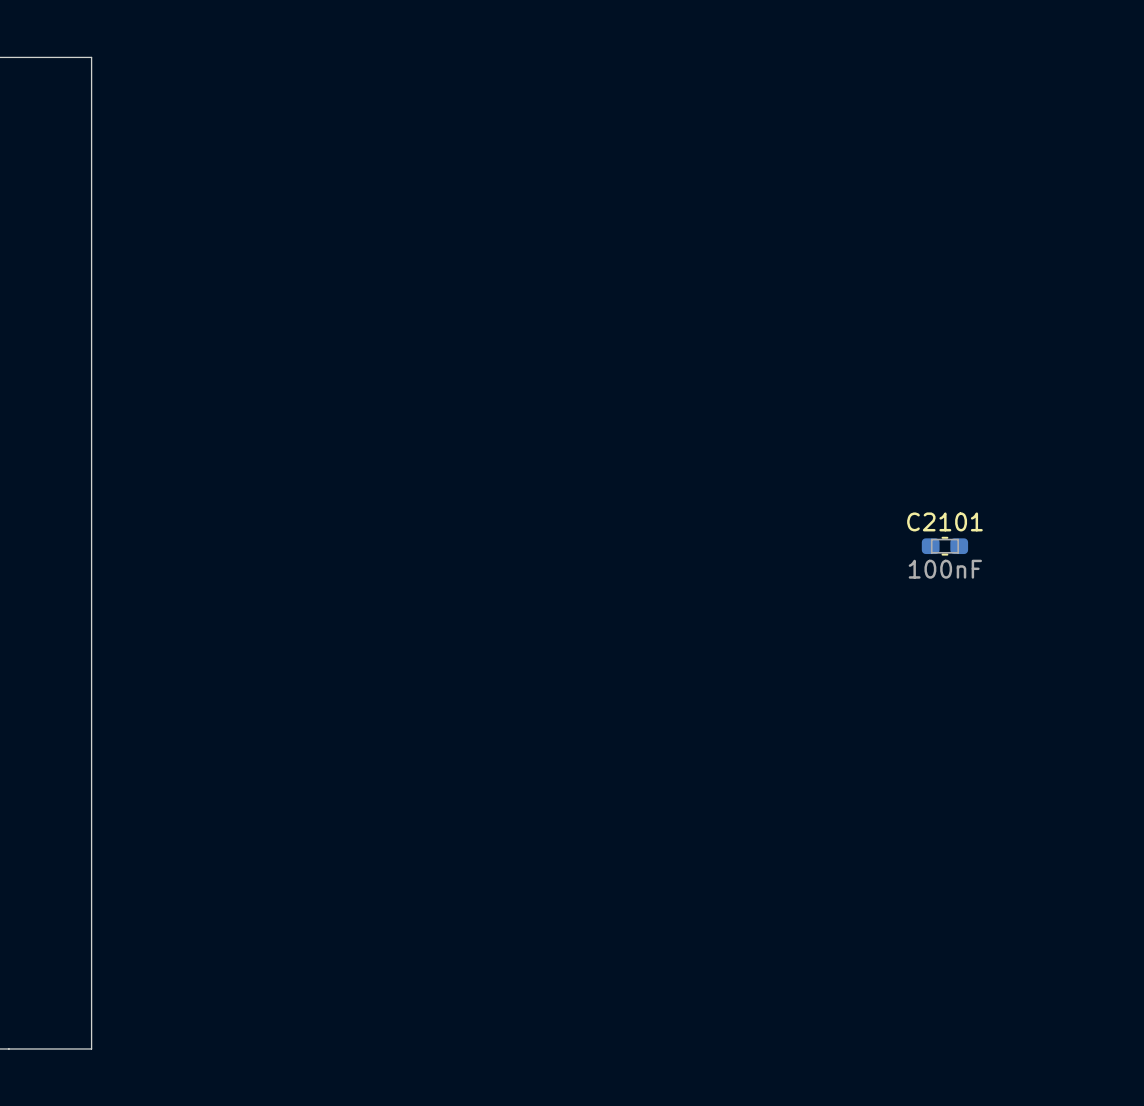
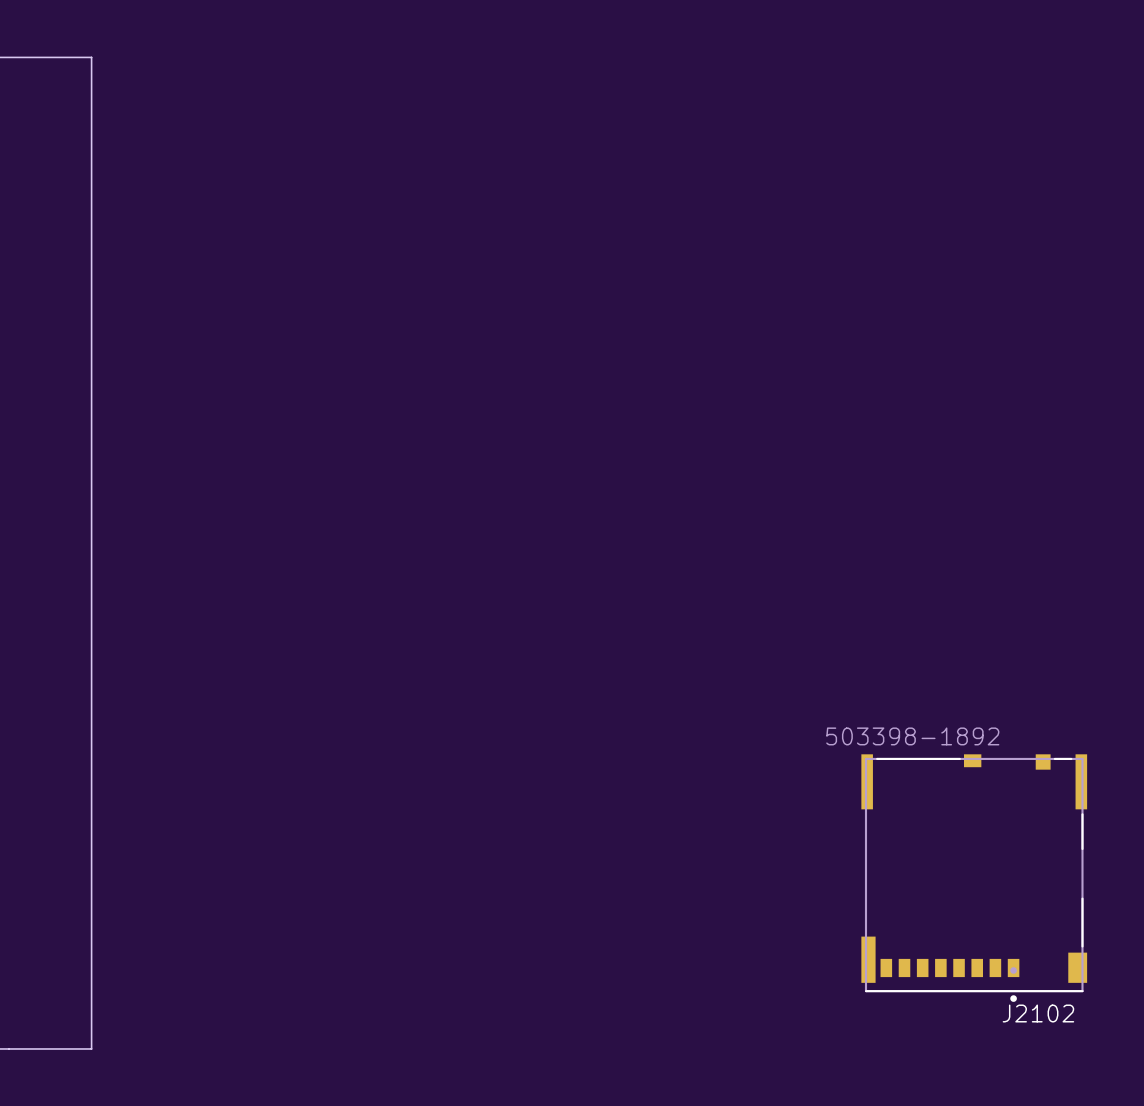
C2101: 100nF (944, 546) -> none
J2102: none -> 503398-1892 (974, 878)

